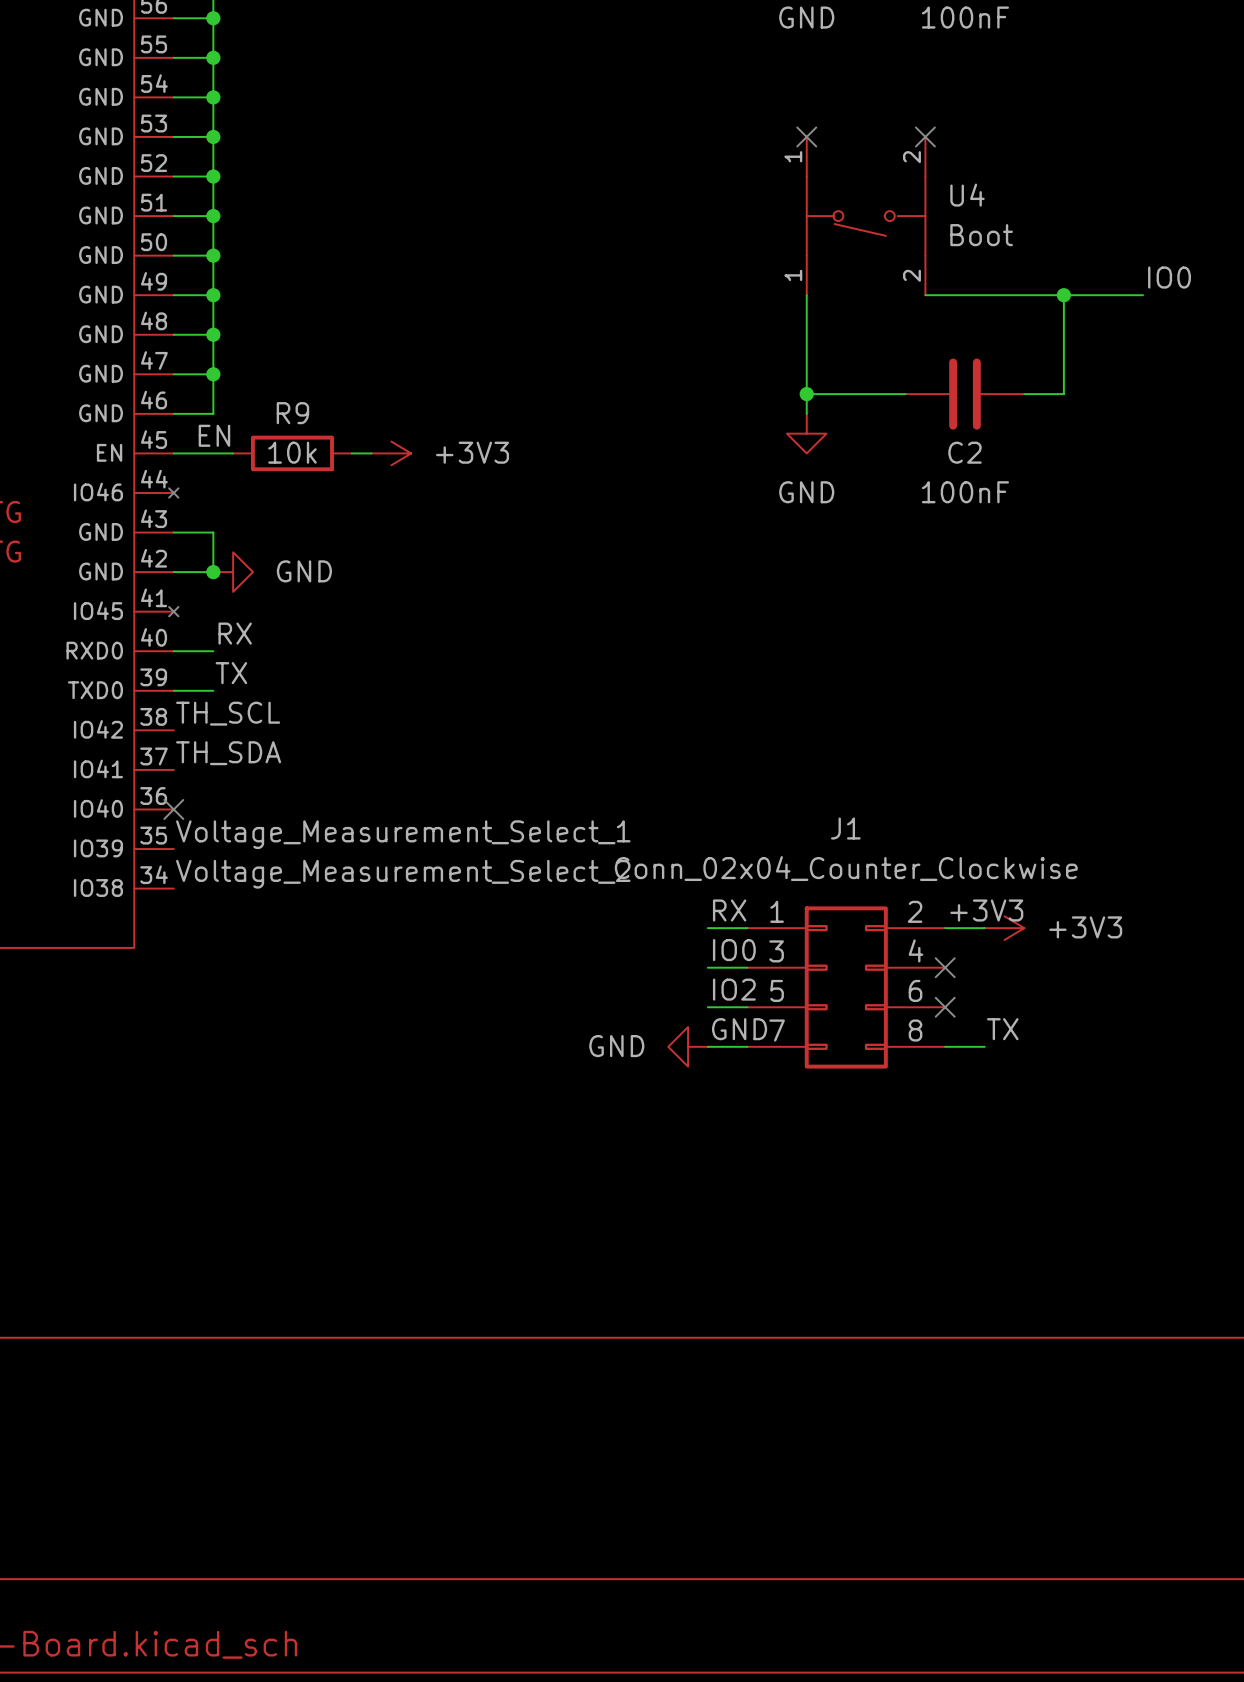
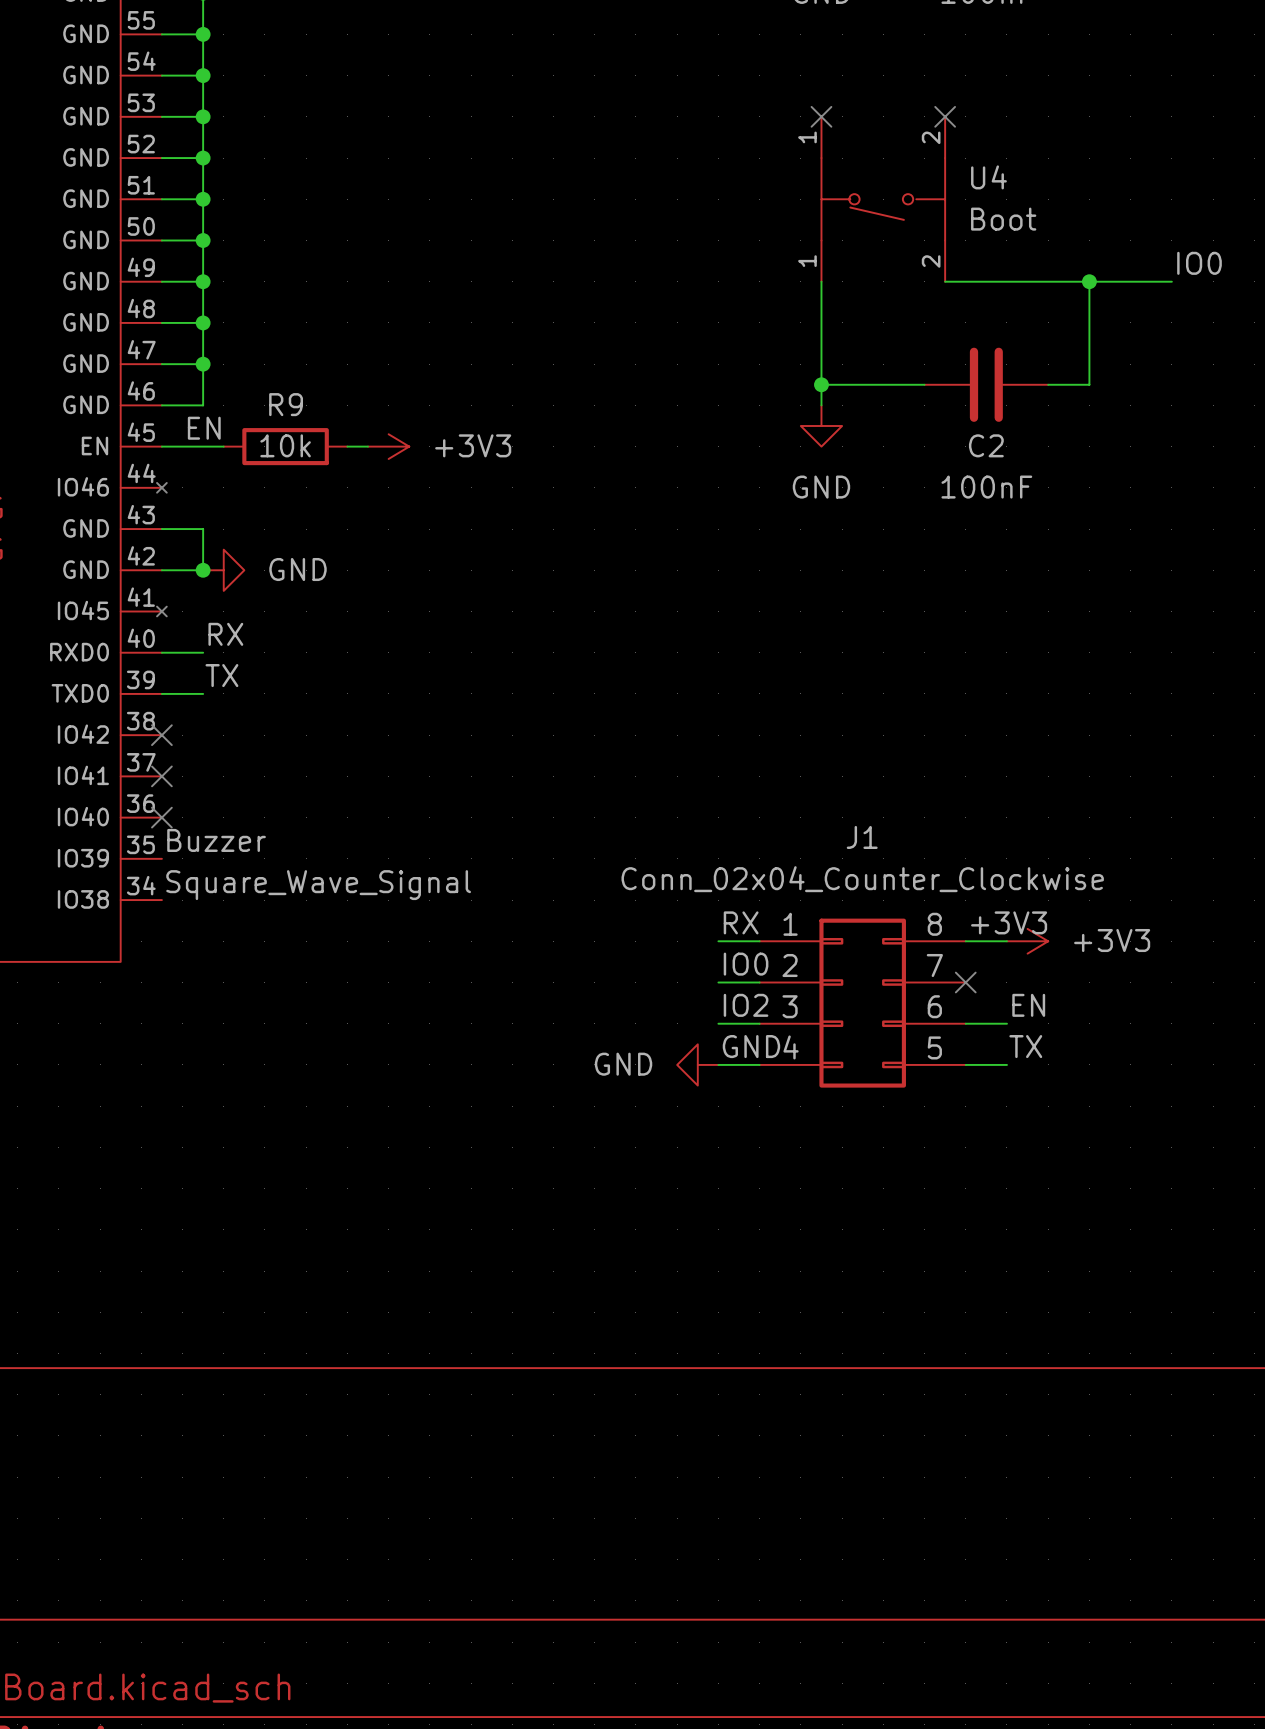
label: TH_SCL (228, 713) -> none
no-connect mark: none -> (161, 735)
label: TH_SDA (228, 753) -> none
no-connect mark: none -> (161, 776)
label: Voltage_Measurement_Select_1 (403, 834) -> Buzzer (216, 840)
label: Voltage_Measurement_Select_2 (403, 874) -> Square_Wave_Signal (318, 885)
J1 pin number: 2 (915, 911) -> 8 (934, 924)
J1 pin number: 4 (916, 950) -> 7 (934, 965)
J1 pin number: 3 (776, 951) -> 2 (790, 965)
label: none -> EN (1028, 1005)
J1 pin number: 5 (777, 990) -> 3 (790, 1006)
wire: none -> (965, 1023) (1006, 1023)
no-connect mark: (945, 1007) -> none
J1 pin number: 7 (777, 1030) -> 4 (791, 1047)
J1 pin number: 8 (915, 1030) -> 5 (934, 1047)

